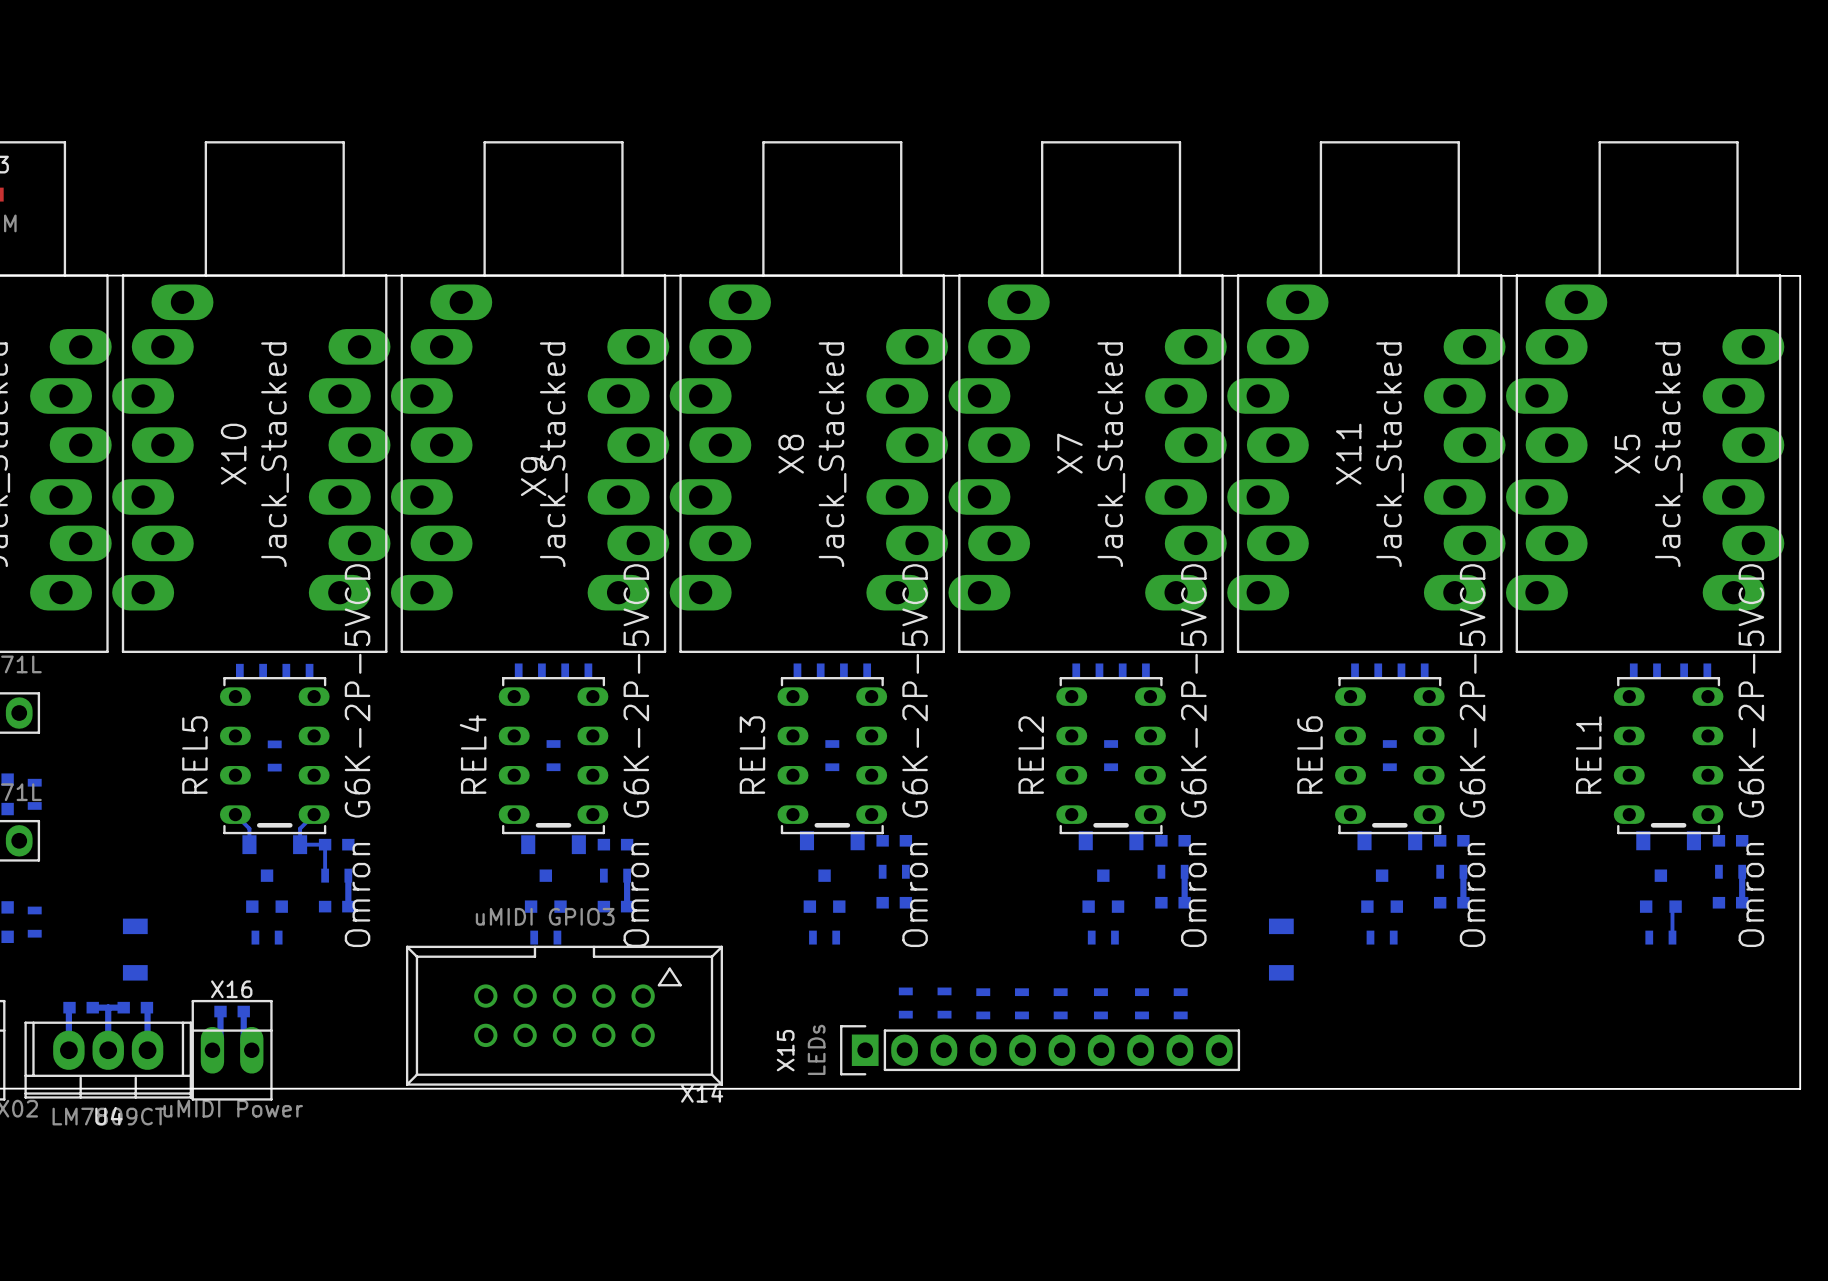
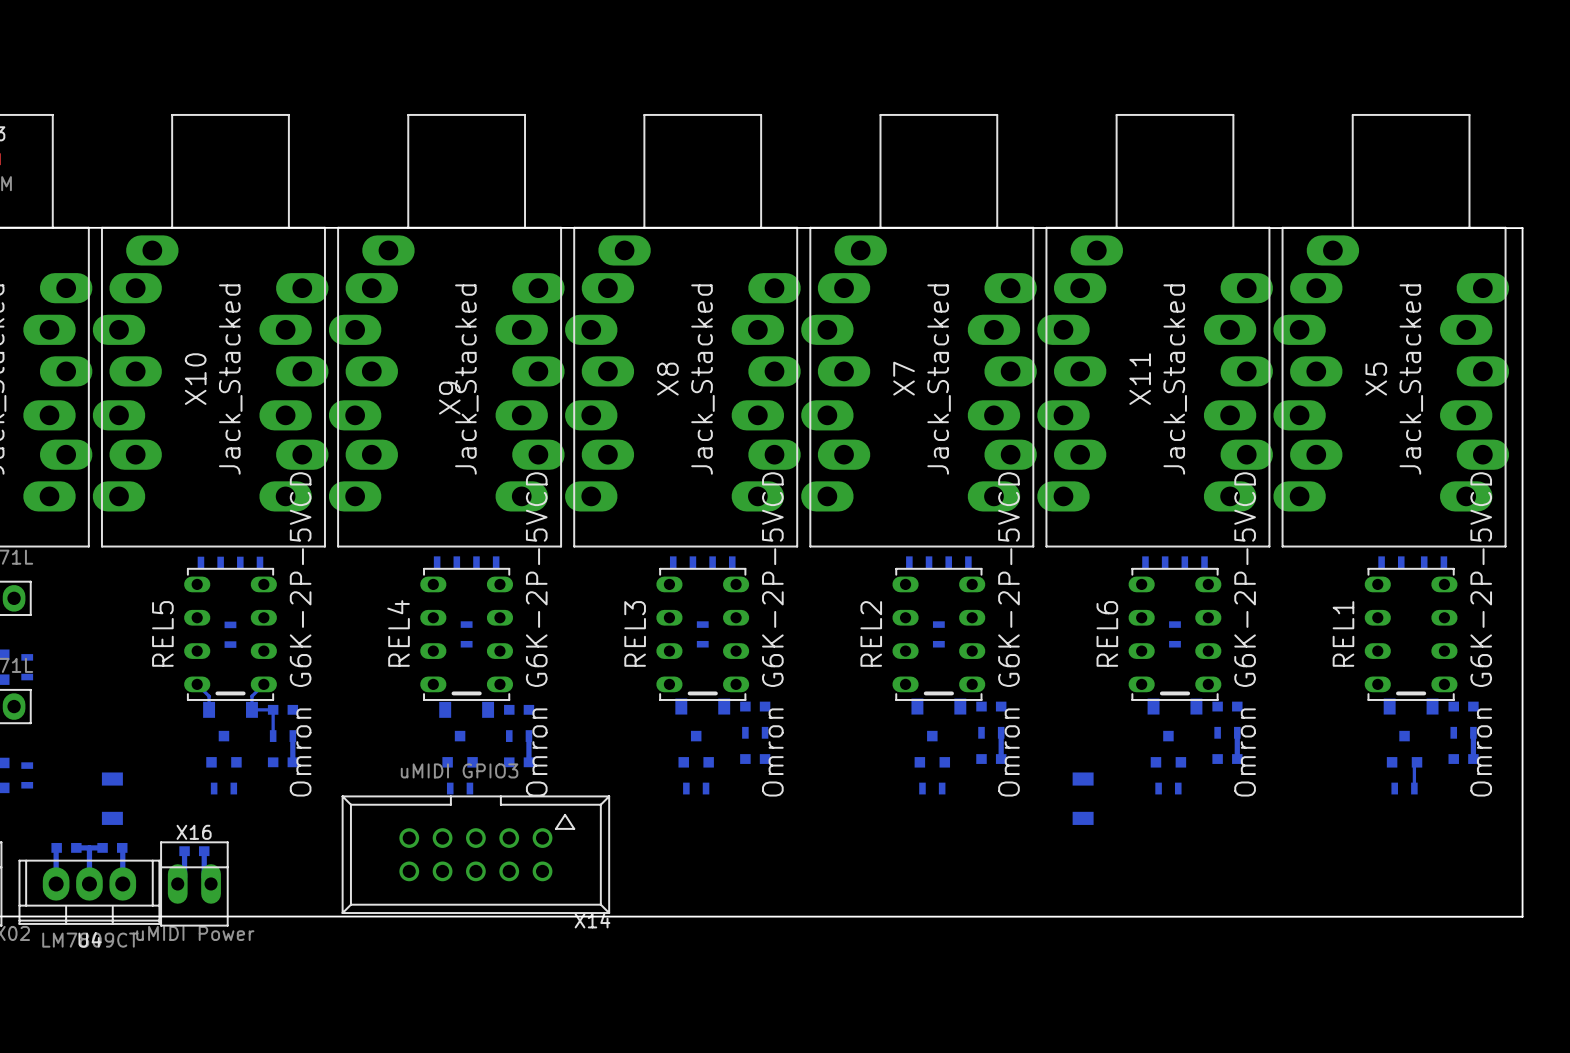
part: (905, 1003) -> none
part: (944, 1003) -> none
part: (983, 1003) -> none
part: (1021, 1003) -> none
part: (1060, 1003) -> none
part: (1100, 1003) -> none
part: (1141, 1003) -> none
part: (1180, 1003) -> none
X15: LEDs (1040, 1050) -> none

